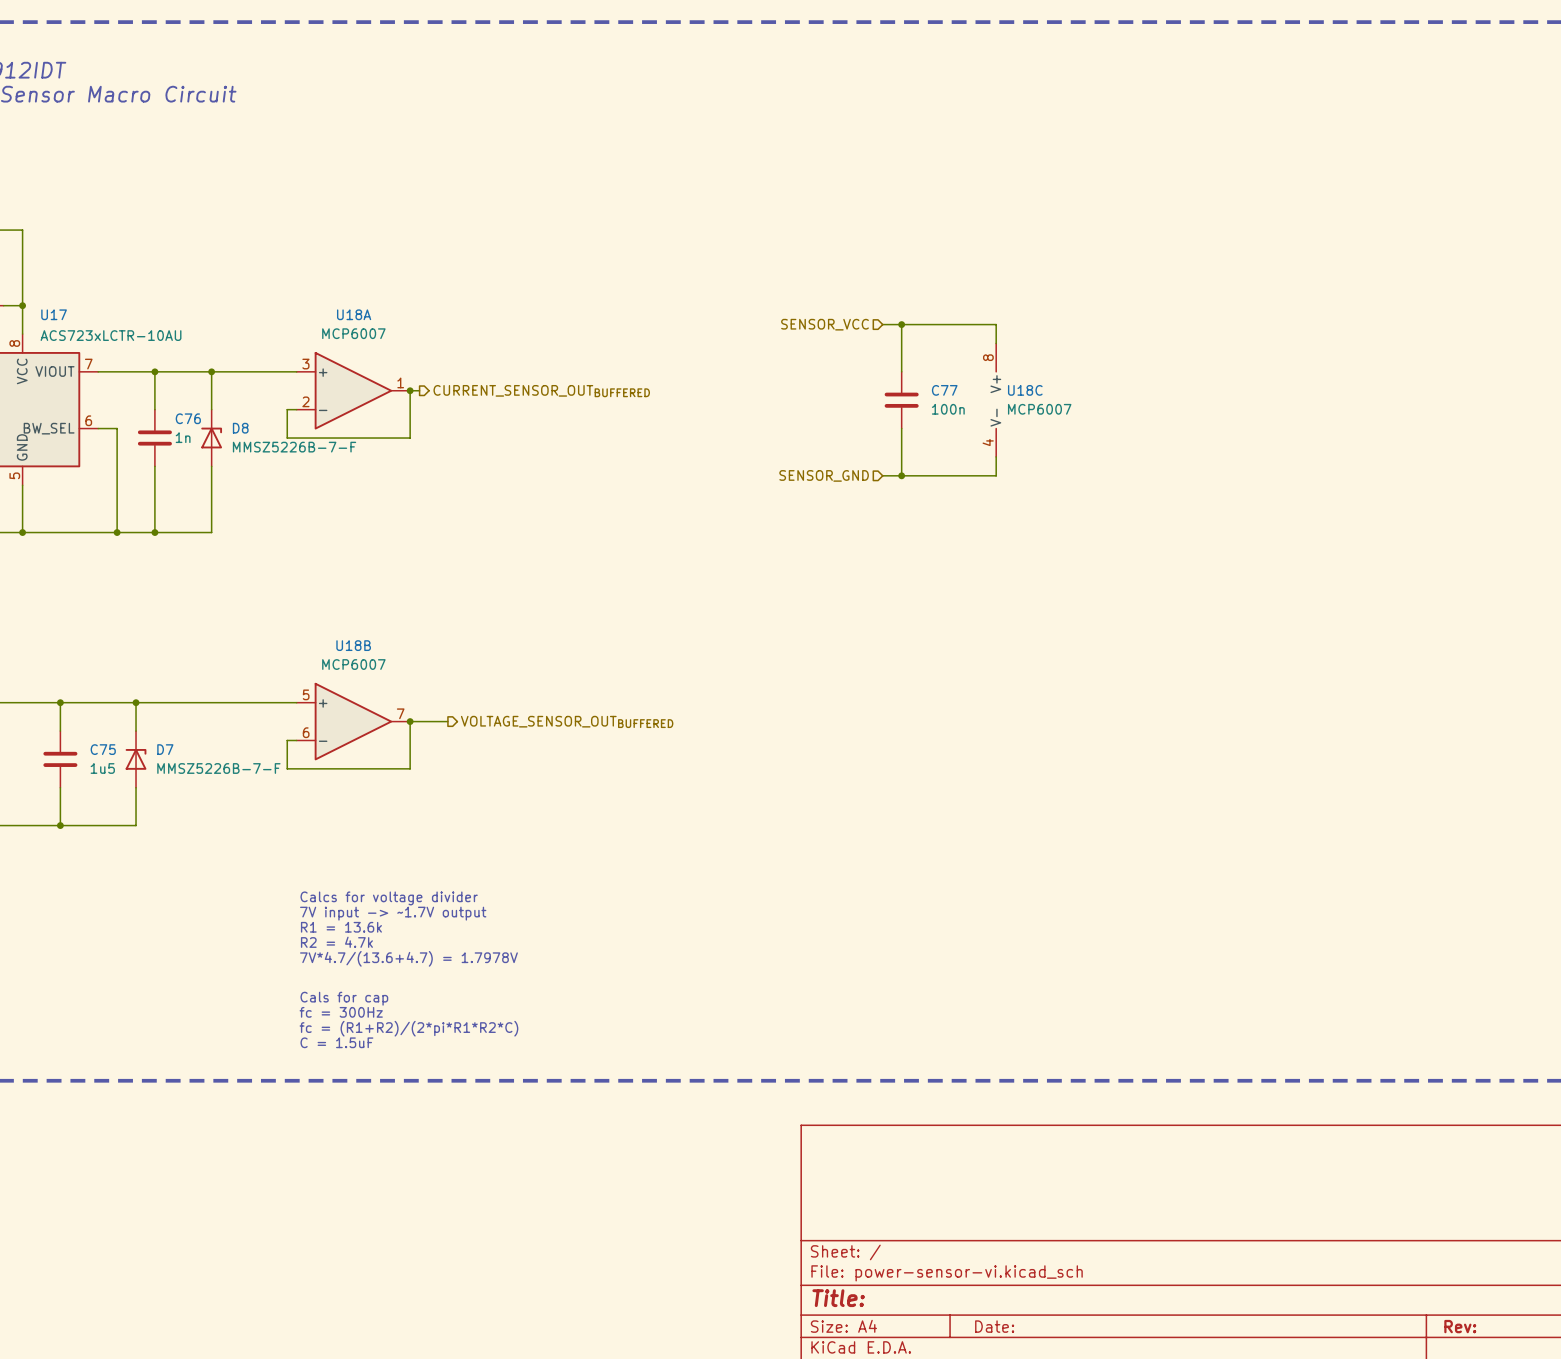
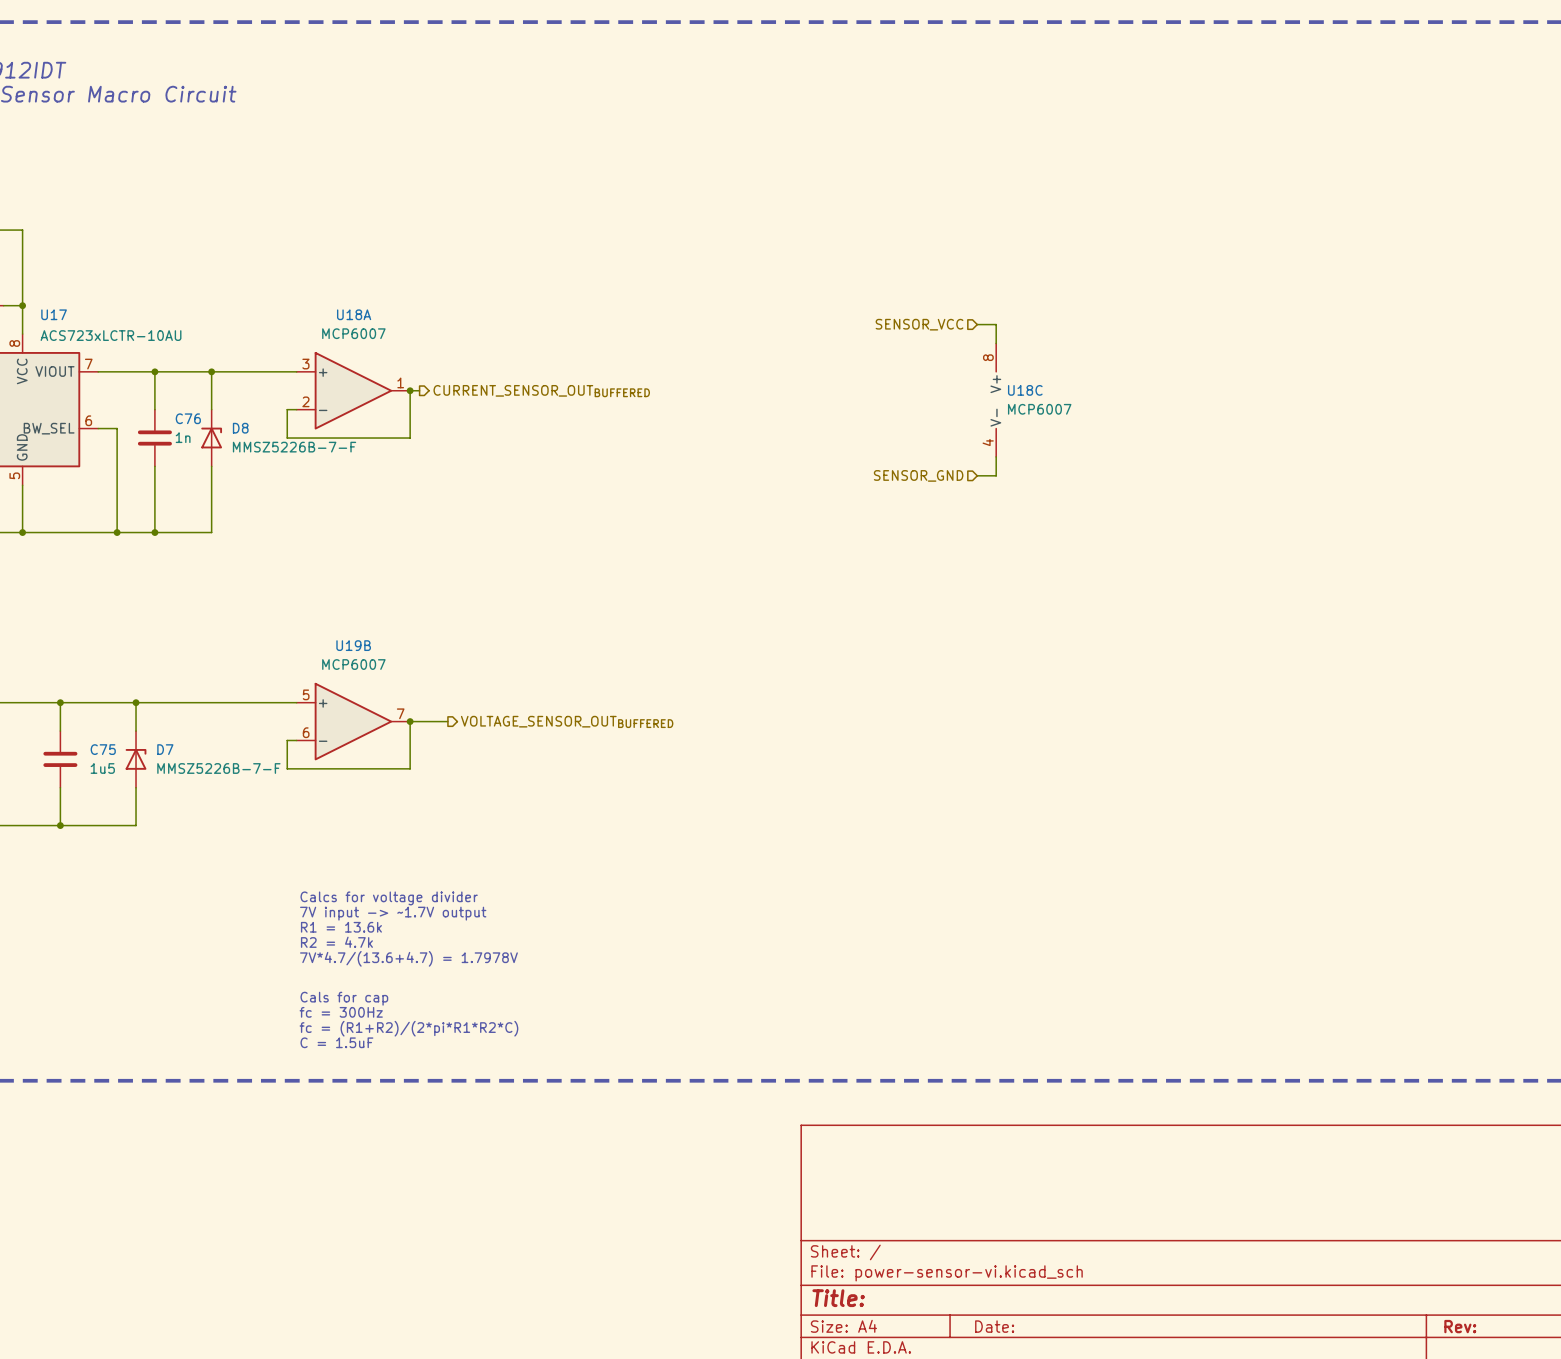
hierarchical label position: SENSOR_VCC (825, 324) -> SENSOR_VCC (919, 324)
wire: (882, 324) (977, 324) -> none
wire: (901, 324) (901, 371) -> none
junction: (901, 324) -> none
C77: 100n (901, 400) -> none
wire: (901, 428) (901, 475) -> none
hierarchical label position: SENSOR_GND (824, 475) -> SENSOR_GND (918, 475)
wire: (882, 475) (977, 475) -> none
junction: (901, 475) -> none
U18B name: U18B (353, 645) -> U19B (353, 645)

